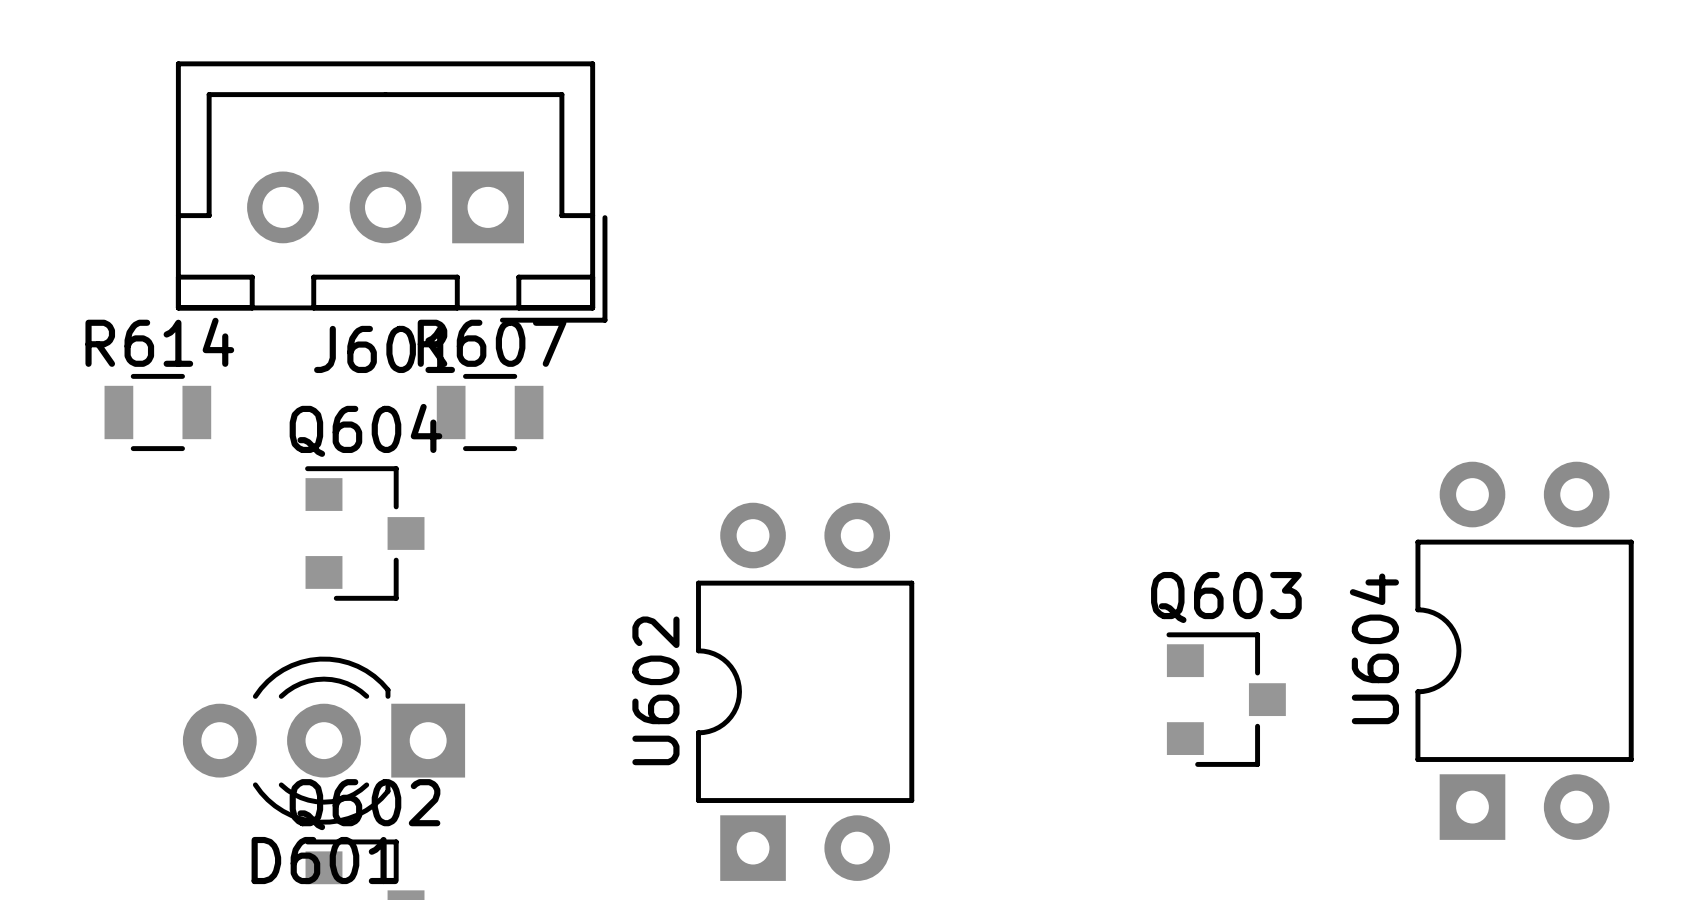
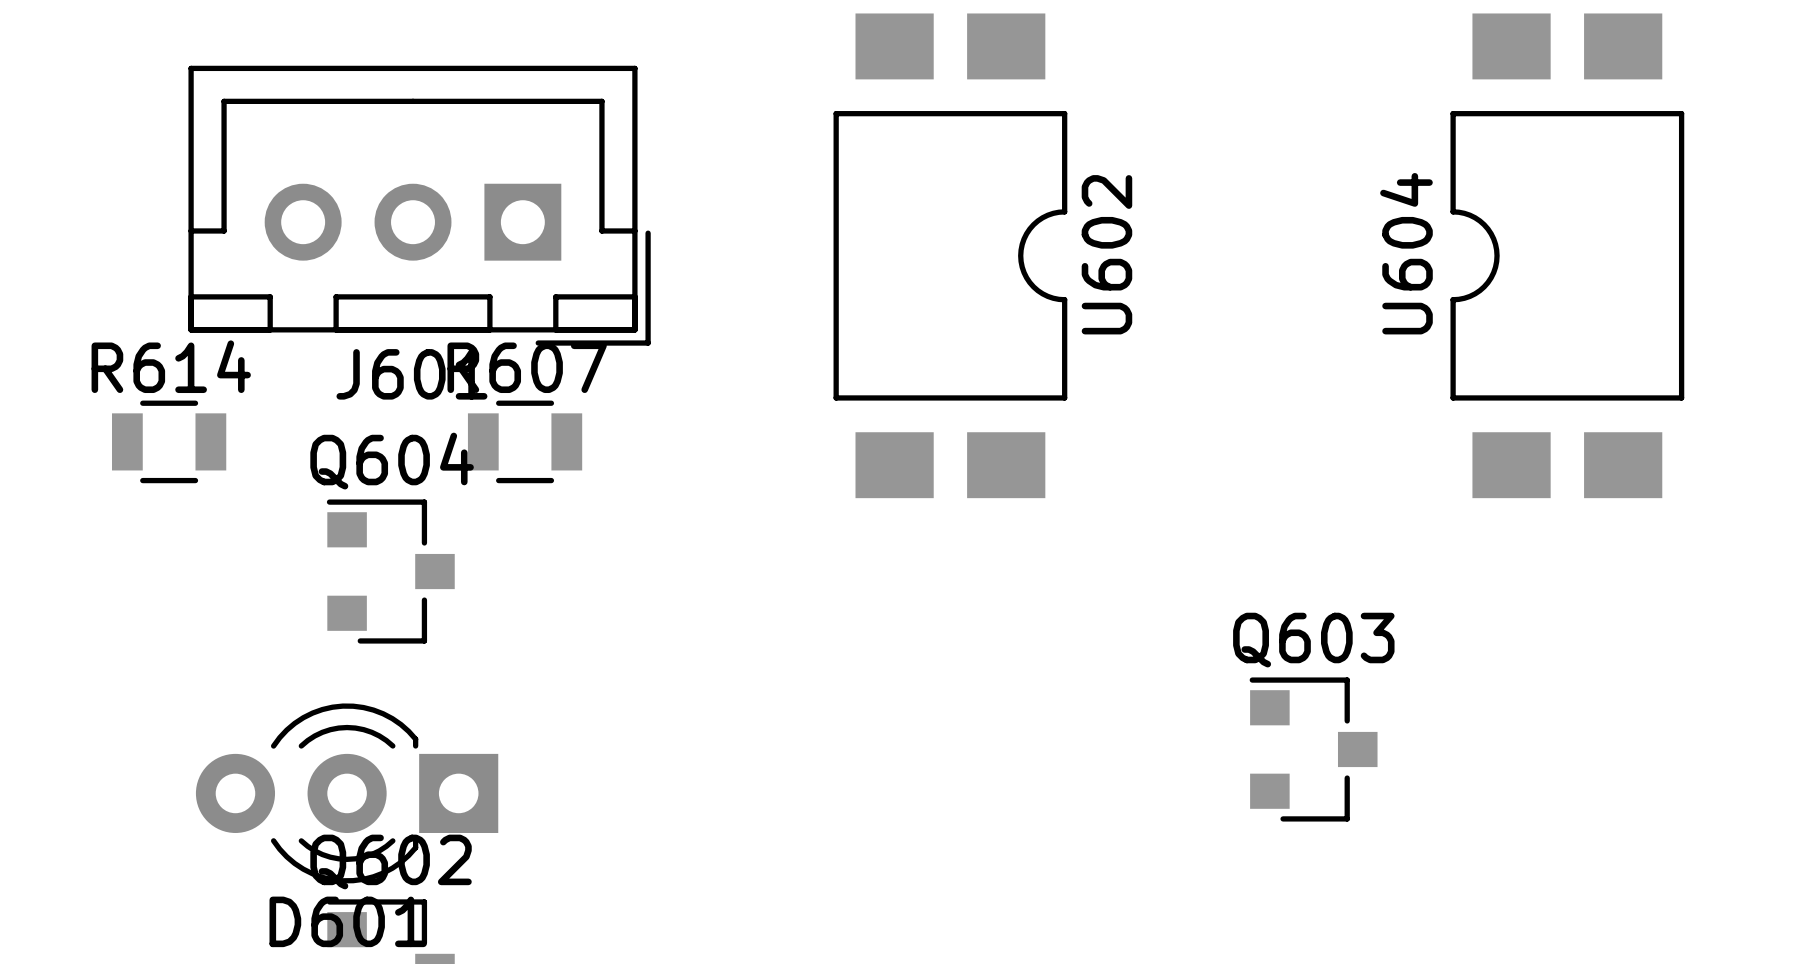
U604 footprint: [1415, 461, 1634, 840] -> [1450, 13, 1685, 499]
U602 footprint: [696, 502, 915, 881] -> [833, 13, 1068, 499]
U602 name position: U602 (655, 690) -> U602 (1106, 254)

